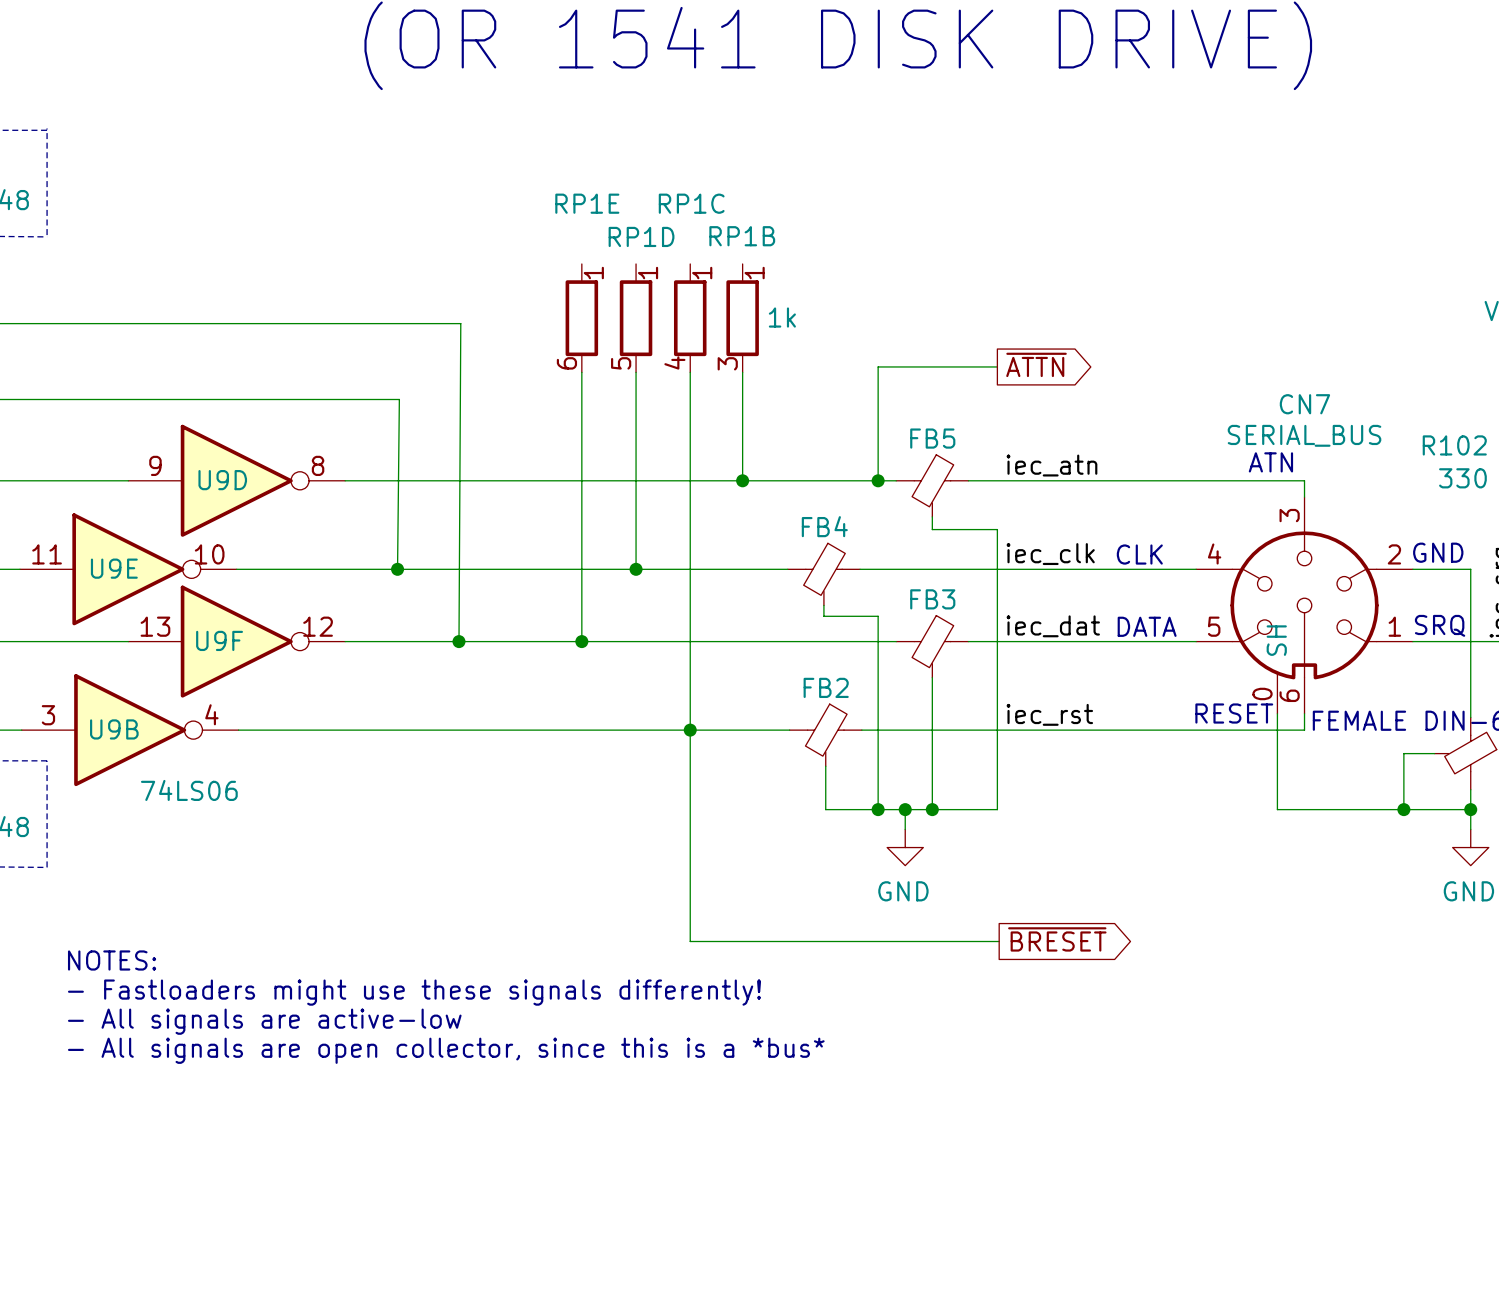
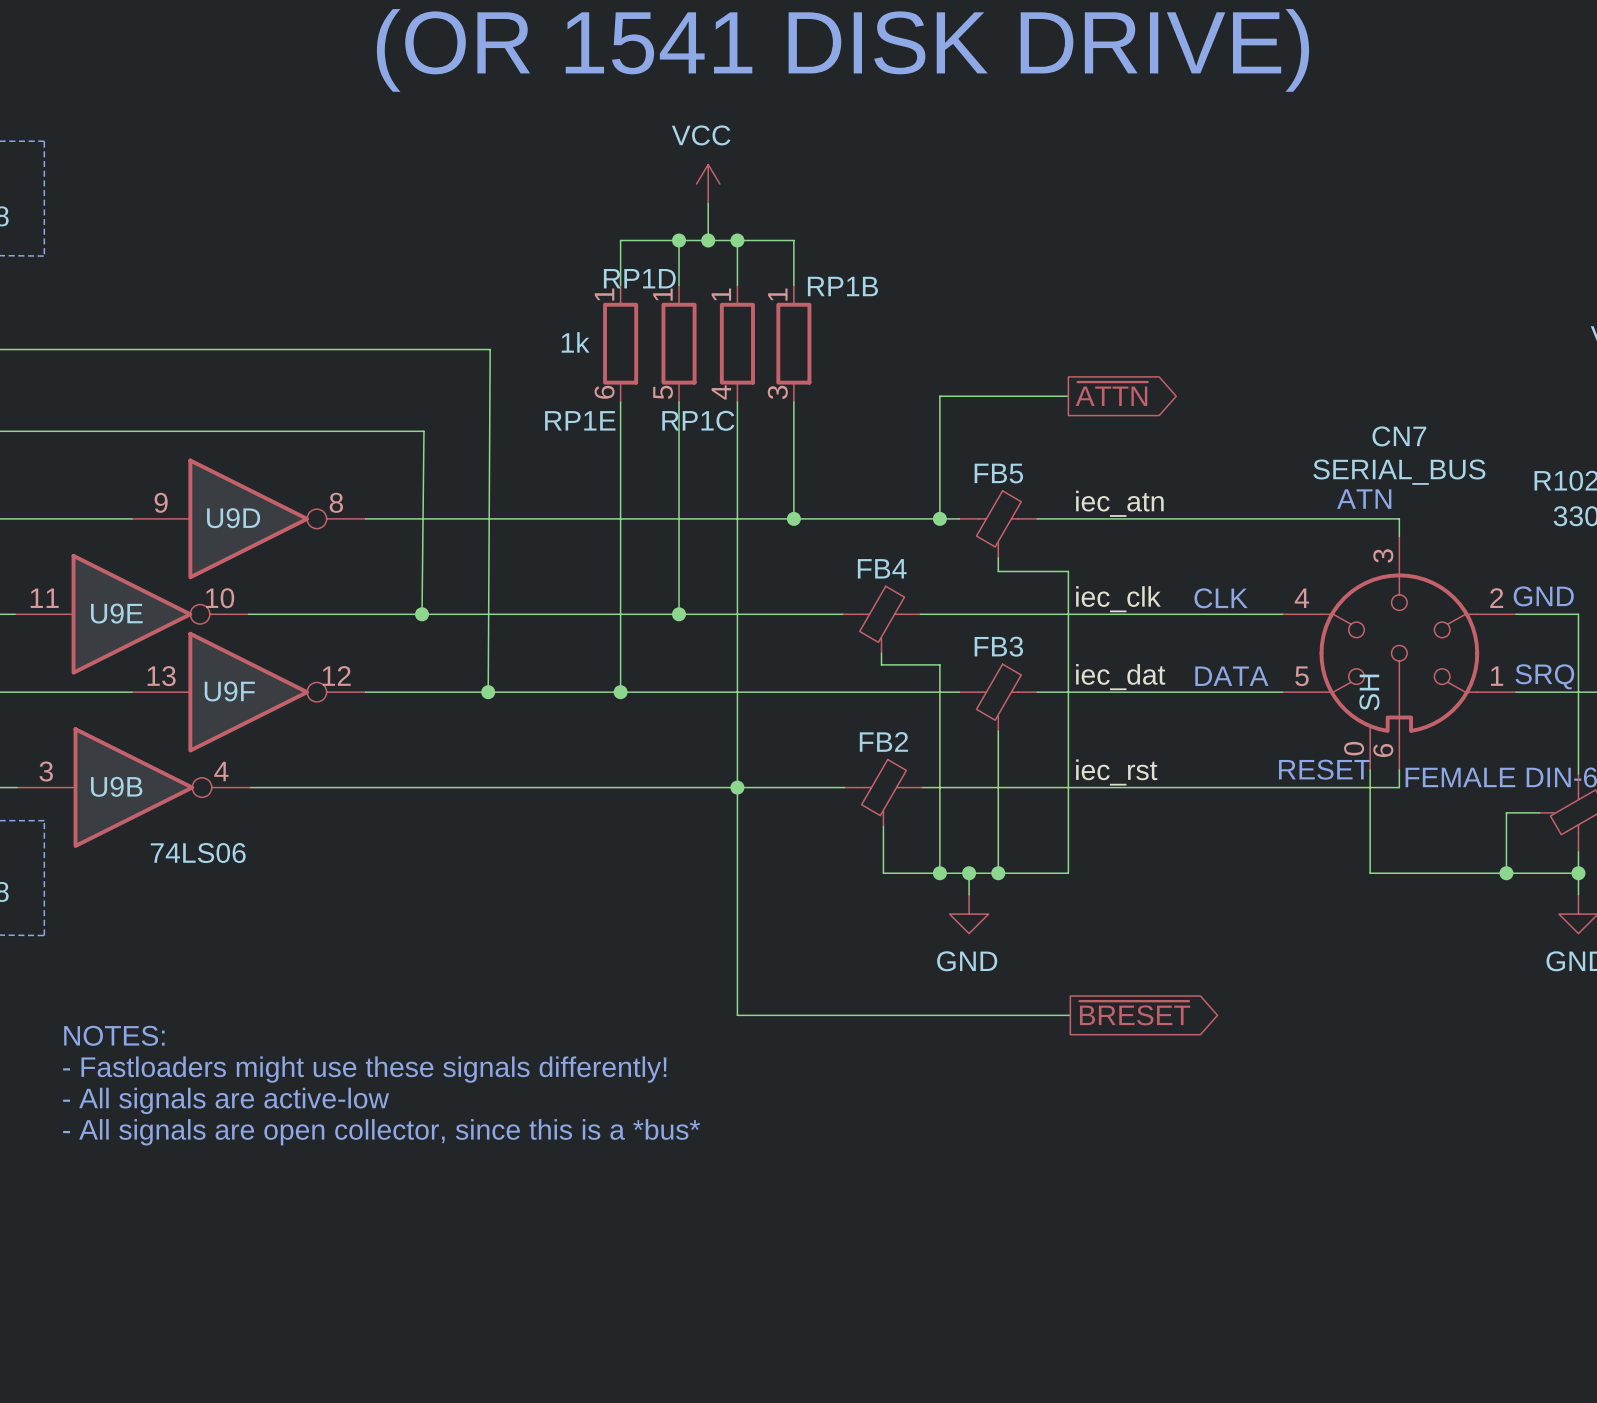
power symbol: none -> VCC (708, 184)
wire: none -> (708, 203) (708, 240)
RP1E name position: RP1E (587, 203) -> RP1E (580, 420)
RP1C name position: RP1C (691, 203) -> RP1C (698, 420)
wire: none -> (679, 240) (679, 285)
junction: none -> (679, 240)
junction: none -> (708, 240)
wire: none -> (737, 240) (737, 285)
junction: none -> (737, 240)
RP1D name position: RP1D (641, 236) -> RP1D (639, 278)
RP1B name position: RP1B (742, 236) -> RP1B (842, 286)
RP1E symbol: [565, 263, 599, 373] -> [603, 285, 639, 403]
wire: none -> (620, 285) (620, 240) (793, 240) (793, 285)
RP1D symbol: [619, 263, 653, 373] -> [661, 285, 697, 403]
RP1C symbol: [673, 263, 707, 373] -> [719, 285, 755, 403]
RP1B symbol: [726, 263, 759, 373] -> [776, 285, 812, 403]
RP1E value position: 1k (782, 317) -> 1k (575, 342)

